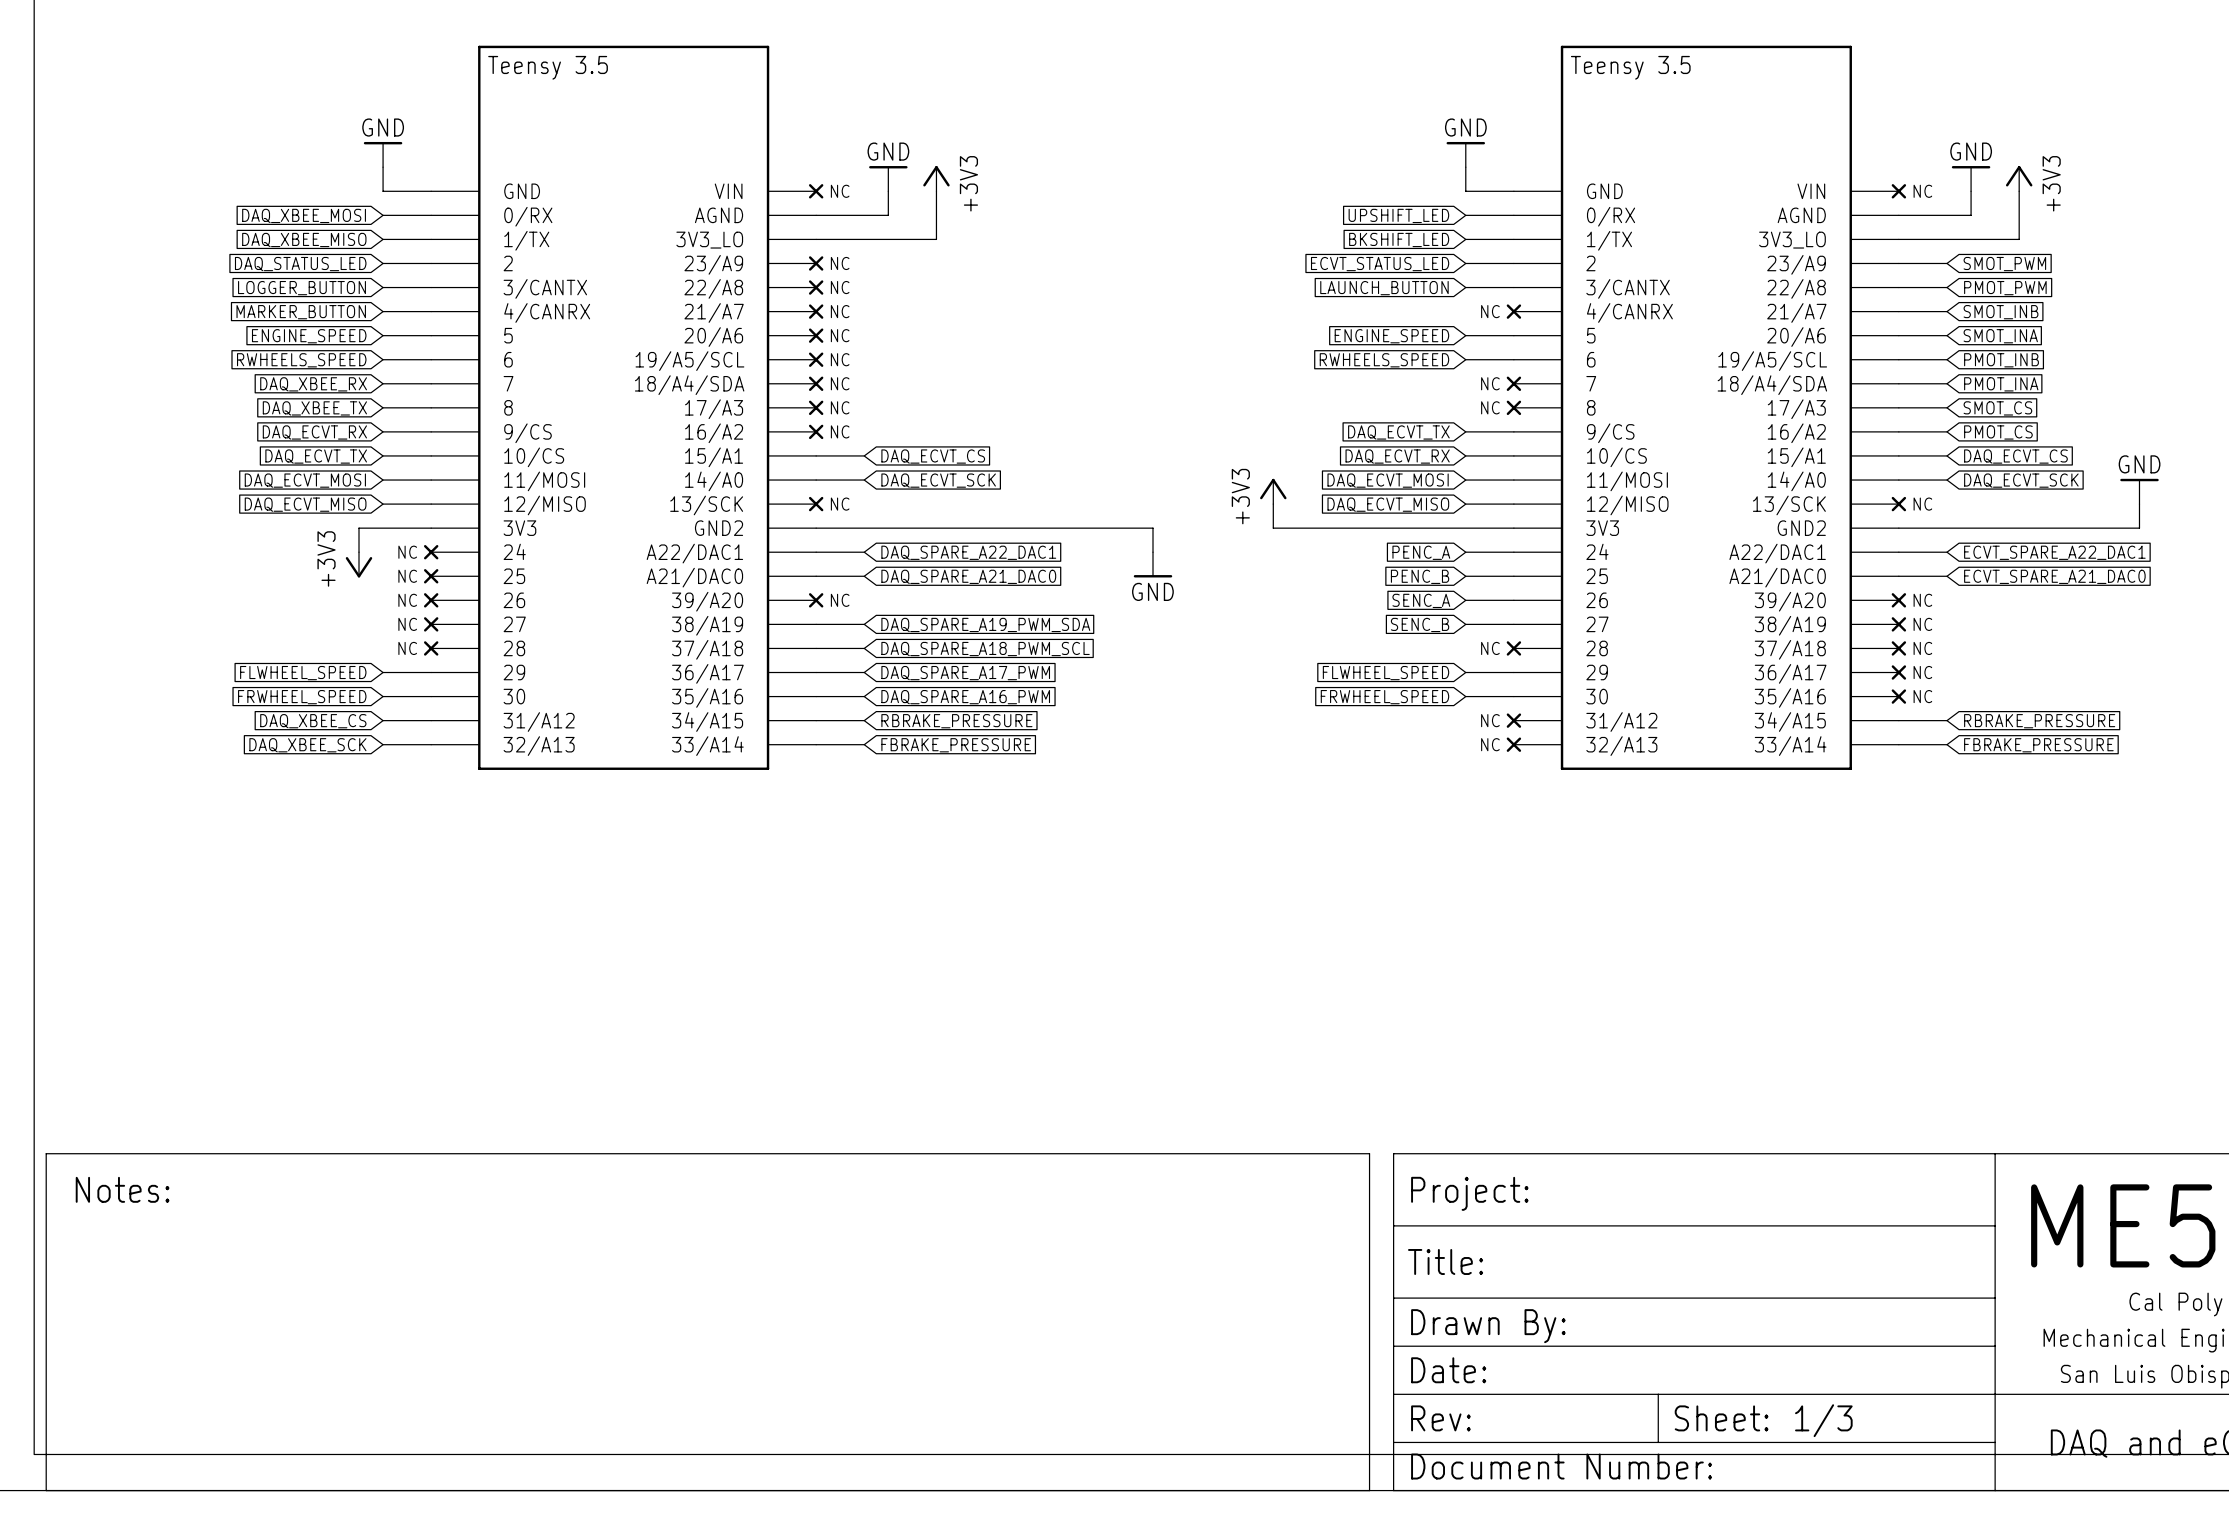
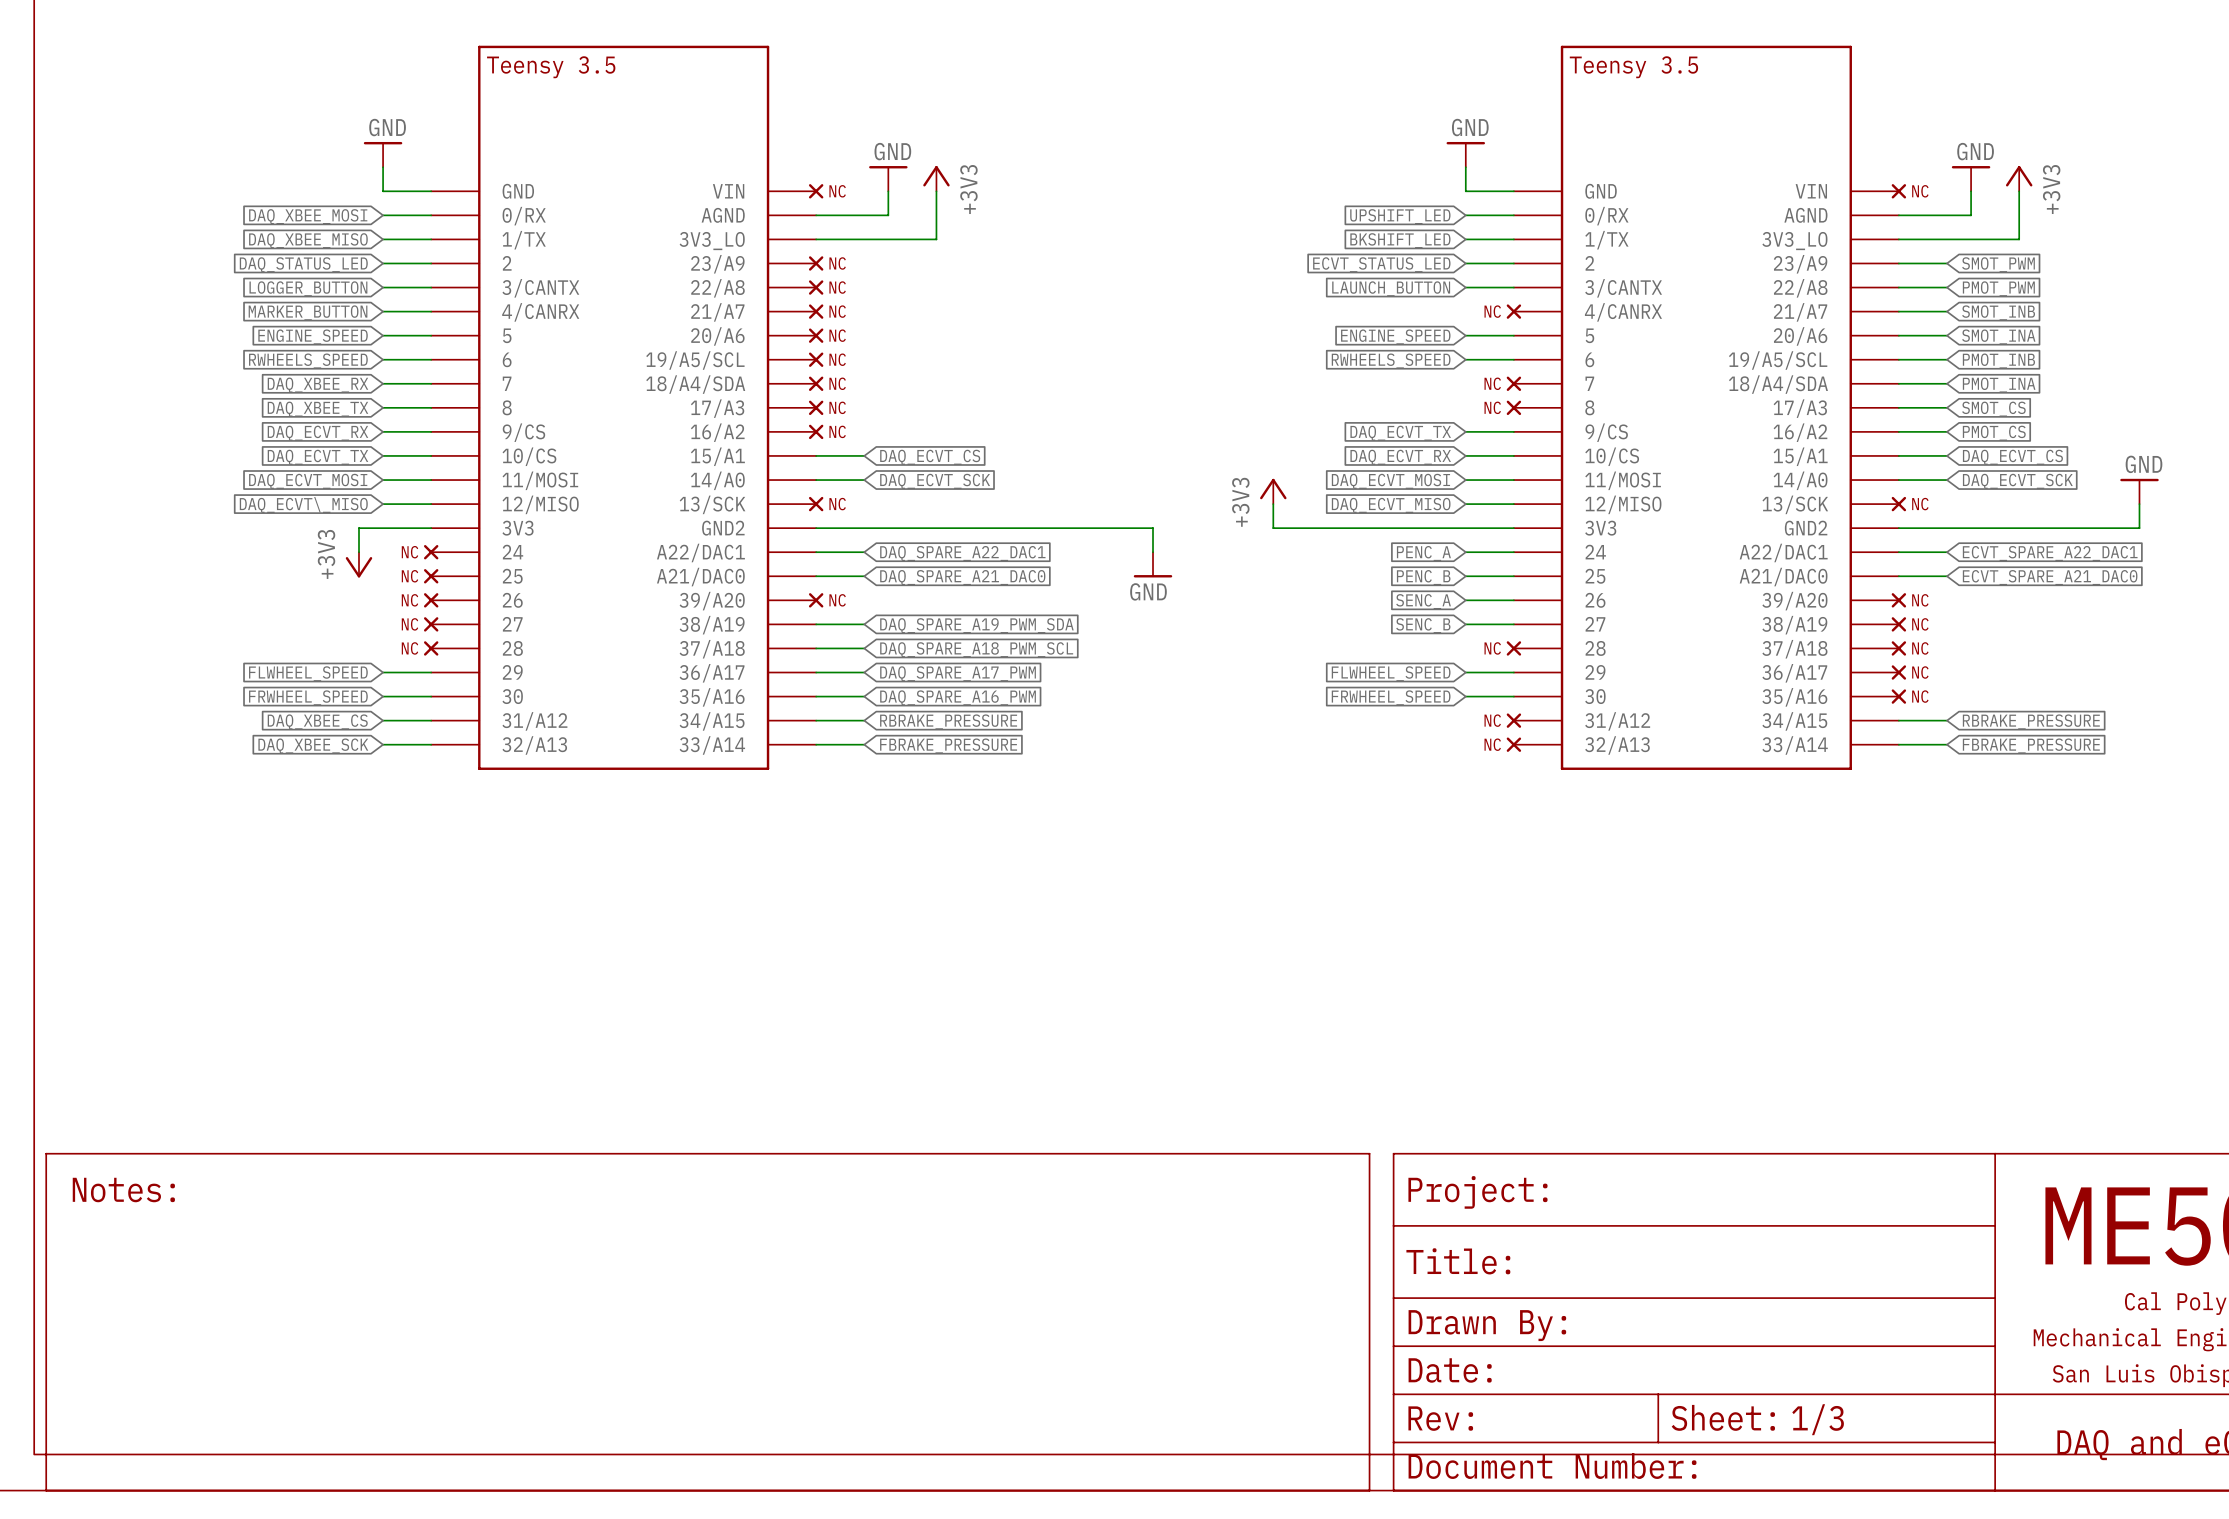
global label: DAQ_ECVT_MISO (305, 504) -> DAQ_ECVT\_MISO (303, 505)

